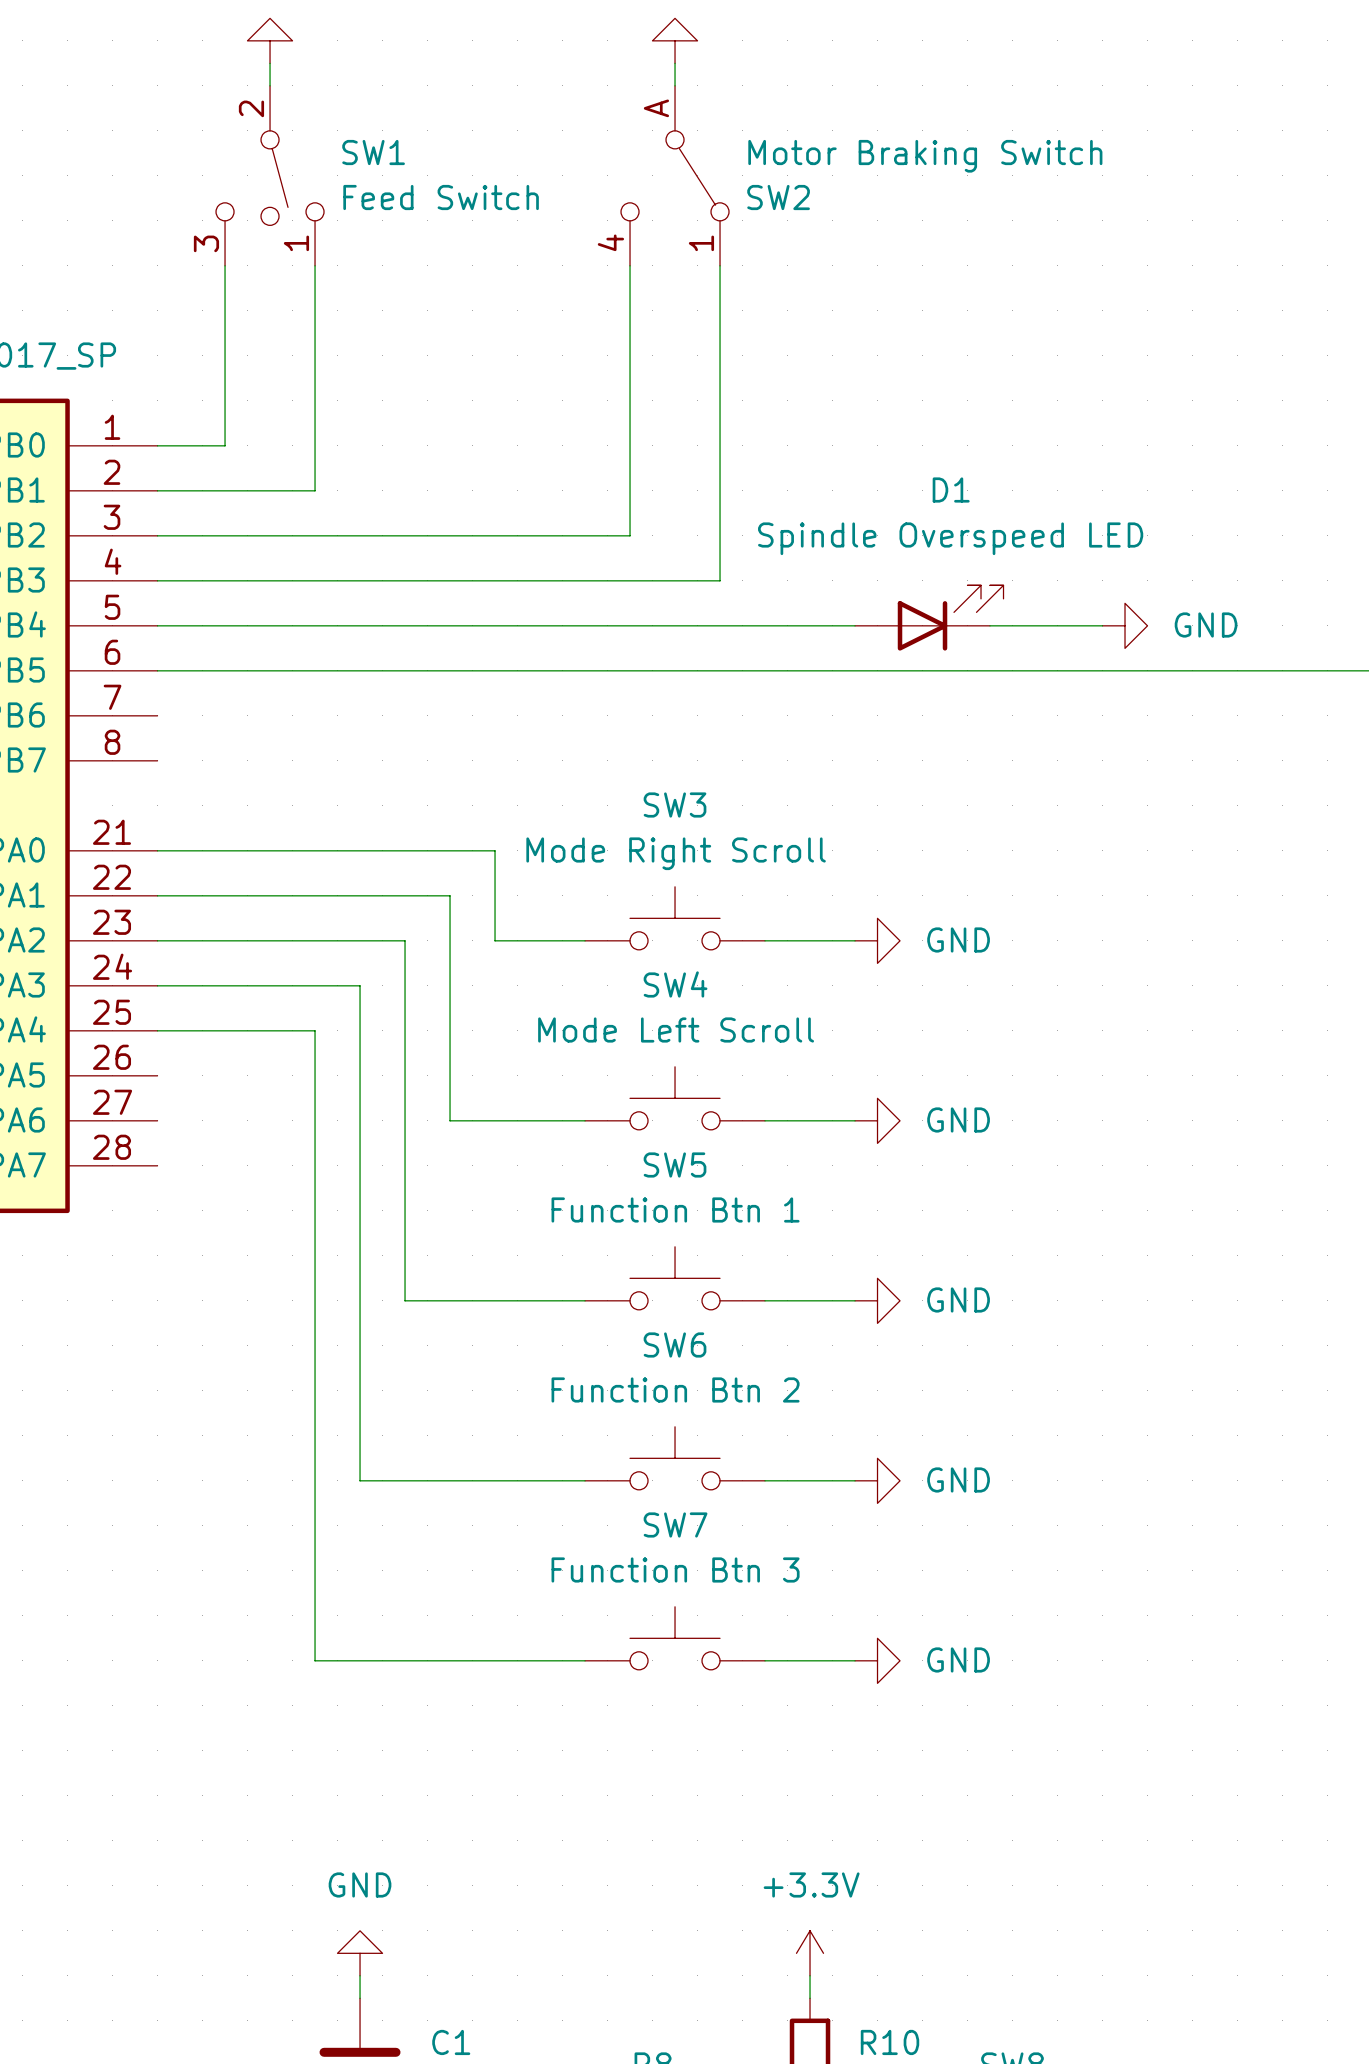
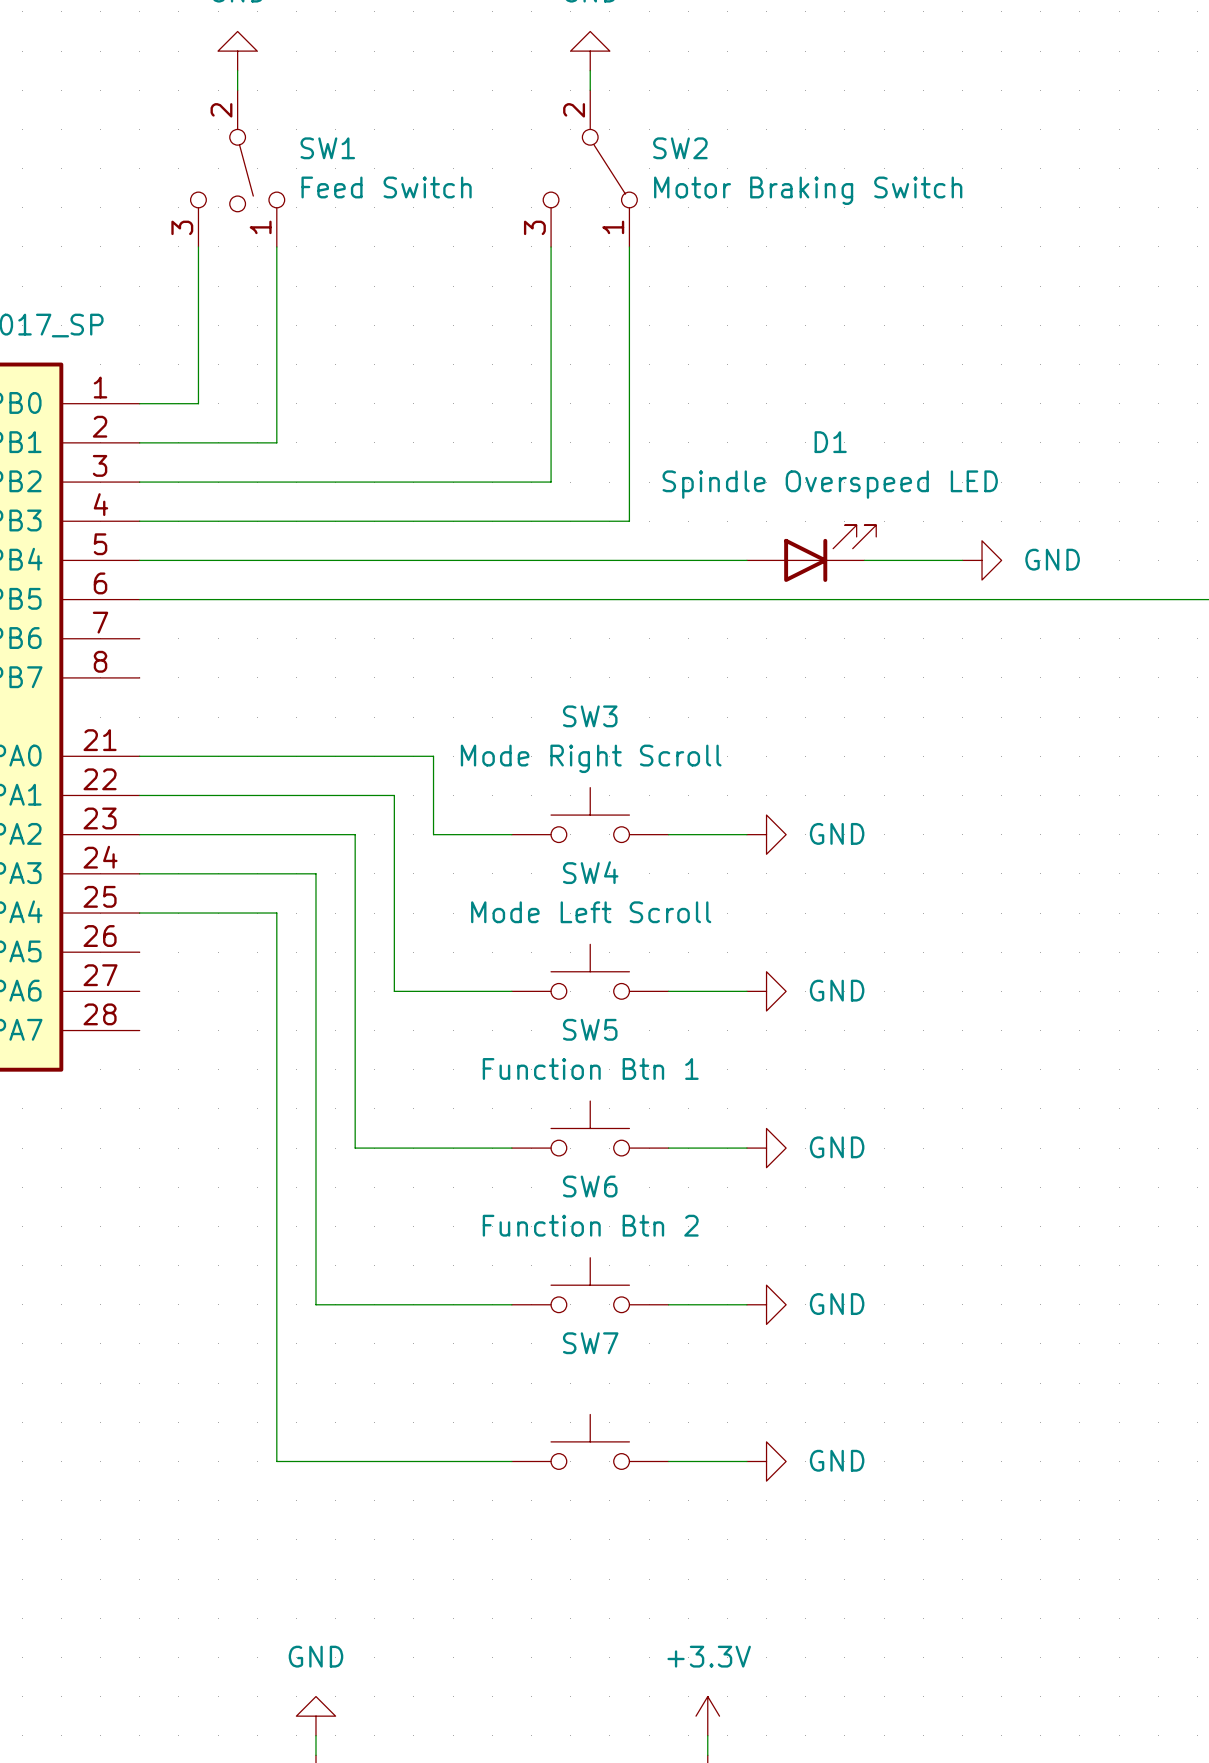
SW2 pin number: A (656, 108) -> 2 (574, 110)
SW2 value position: Motor Braking Switch (925, 156) -> Motor Braking Switch (808, 190)
SW2 name position: SW2 (778, 197) -> SW2 (680, 148)
SW2 pin number: 4 (610, 242) -> 3 (534, 227)
SW7 value: Function Btn 3 (675, 1569) -> none

